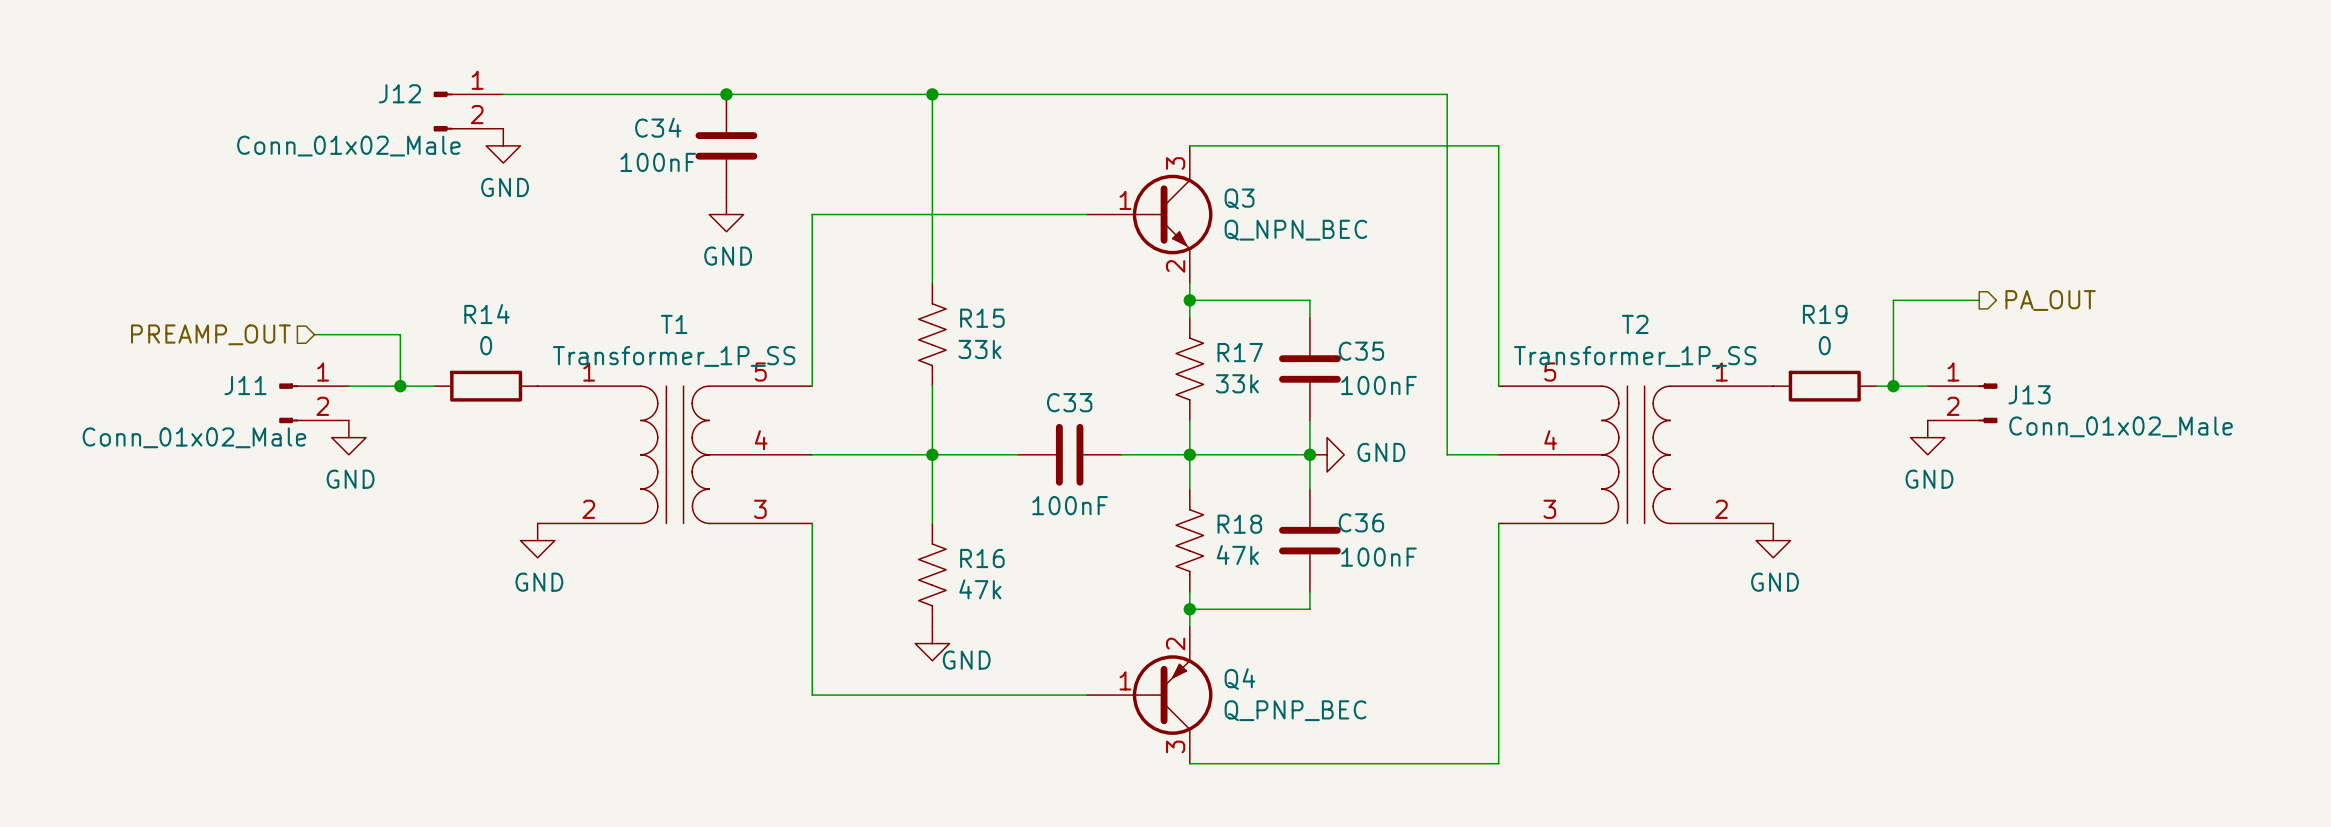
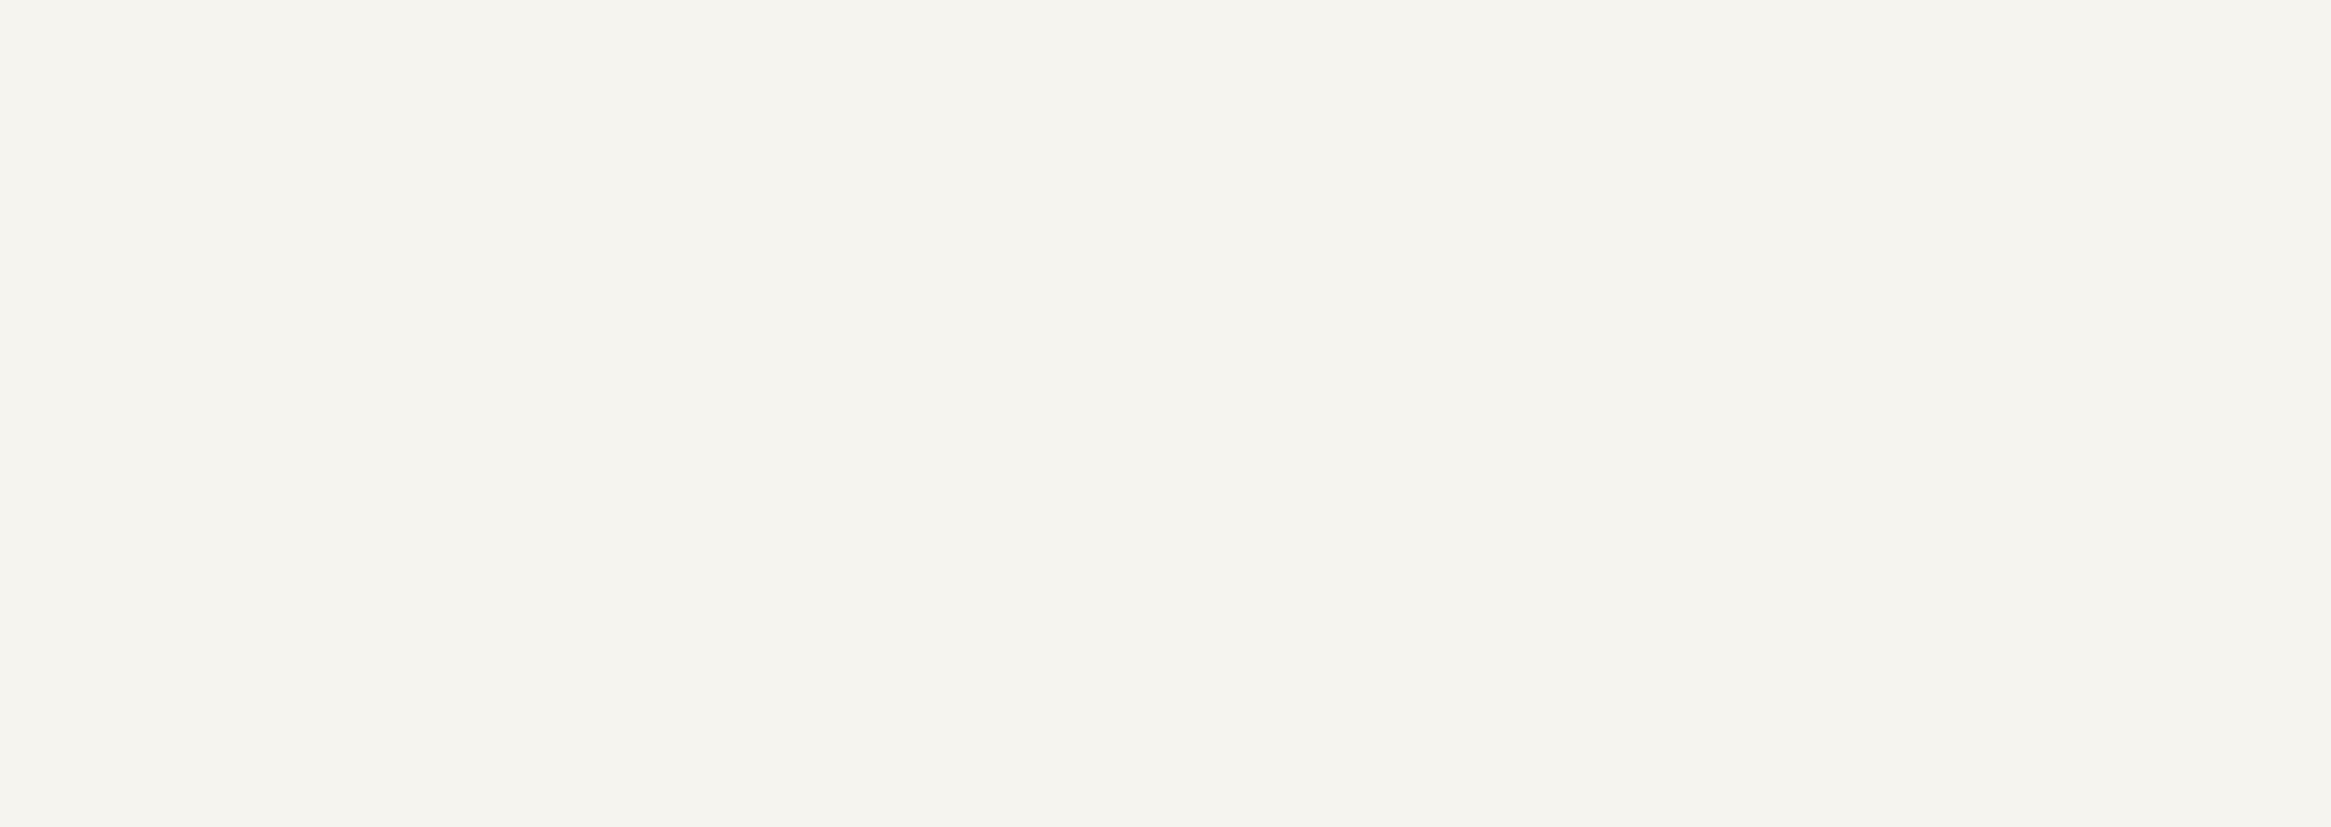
wire: (503, 94) (1447, 94) (1447, 454) (1498, 454) -> none
junction: (726, 94) -> none
wire: (932, 94) (932, 283) -> none
junction: (932, 94) -> none
J12: Conn_01x02_Male (468, 111) -> none
power symbol: GND (503, 145) -> none
C34: 100nF (726, 145) -> none
wire: (1189, 145) (1498, 145) (1498, 386) -> none
power symbol: GND (726, 214) -> none
wire: (1086, 214) (812, 214) (812, 386) -> none
Q3: Q_NPN_BEC (1149, 214) -> none
wire: (1189, 283) (1189, 317) -> none
wire: (1189, 300) (1309, 300) (1309, 317) -> none
junction: (1189, 300) -> none
wire: (1979, 300) (1893, 300) (1893, 386) -> none
hierarchical label: PA_OUT (2050, 300) -> none
hierarchical label: PREAMP_OUT (210, 334) -> none
wire: (314, 334) (400, 334) (400, 386) -> none
R15: 33k (932, 334) -> none
R17: 33k (1189, 368) -> none
C35: 100nF (1309, 368) -> none
wire: (348, 386) (434, 386) -> none
junction: (400, 386) -> none
R14: 0 (486, 386) -> none
wire: (932, 386) (932, 523) -> none
R19: 0 (1824, 386) -> none
wire: (1876, 386) (1927, 386) -> none
junction: (1893, 386) -> none
J11: Conn_01x02_Male (314, 403) -> none
J13: Conn_01x02_Male (1962, 403) -> none
wire: (1189, 420) (1189, 489) -> none
wire: (1309, 420) (1309, 489) -> none
power symbol: GND (348, 437) -> none
power symbol: GND (1927, 437) -> none
T1: Transformer_1P_SS (674, 454) -> none
wire: (812, 454) (1018, 454) -> none
junction: (932, 454) -> none
C33: 100nF (1069, 454) -> none
wire: (1121, 454) (1309, 454) -> none
junction: (1189, 454) -> none
junction: (1309, 454) -> none
power symbol: GND (1327, 454) -> none
T2: Transformer_1P_SS (1636, 454) -> none
wire: (812, 523) (812, 695) (1086, 695) -> none
wire: (1498, 523) (1498, 763) (1189, 763) -> none
power symbol: GND (537, 540) -> none
R18: 47k (1189, 540) -> none
C36: 100nF (1309, 540) -> none
power symbol: GND (1773, 540) -> none
R16: 47k (932, 574) -> none
wire: (1189, 592) (1189, 626) -> none
wire: (1309, 592) (1309, 609) (1189, 609) -> none
junction: (1189, 609) -> none
power symbol: GND (932, 643) -> none
Q4: Q_PNP_BEC (1149, 695) -> none

